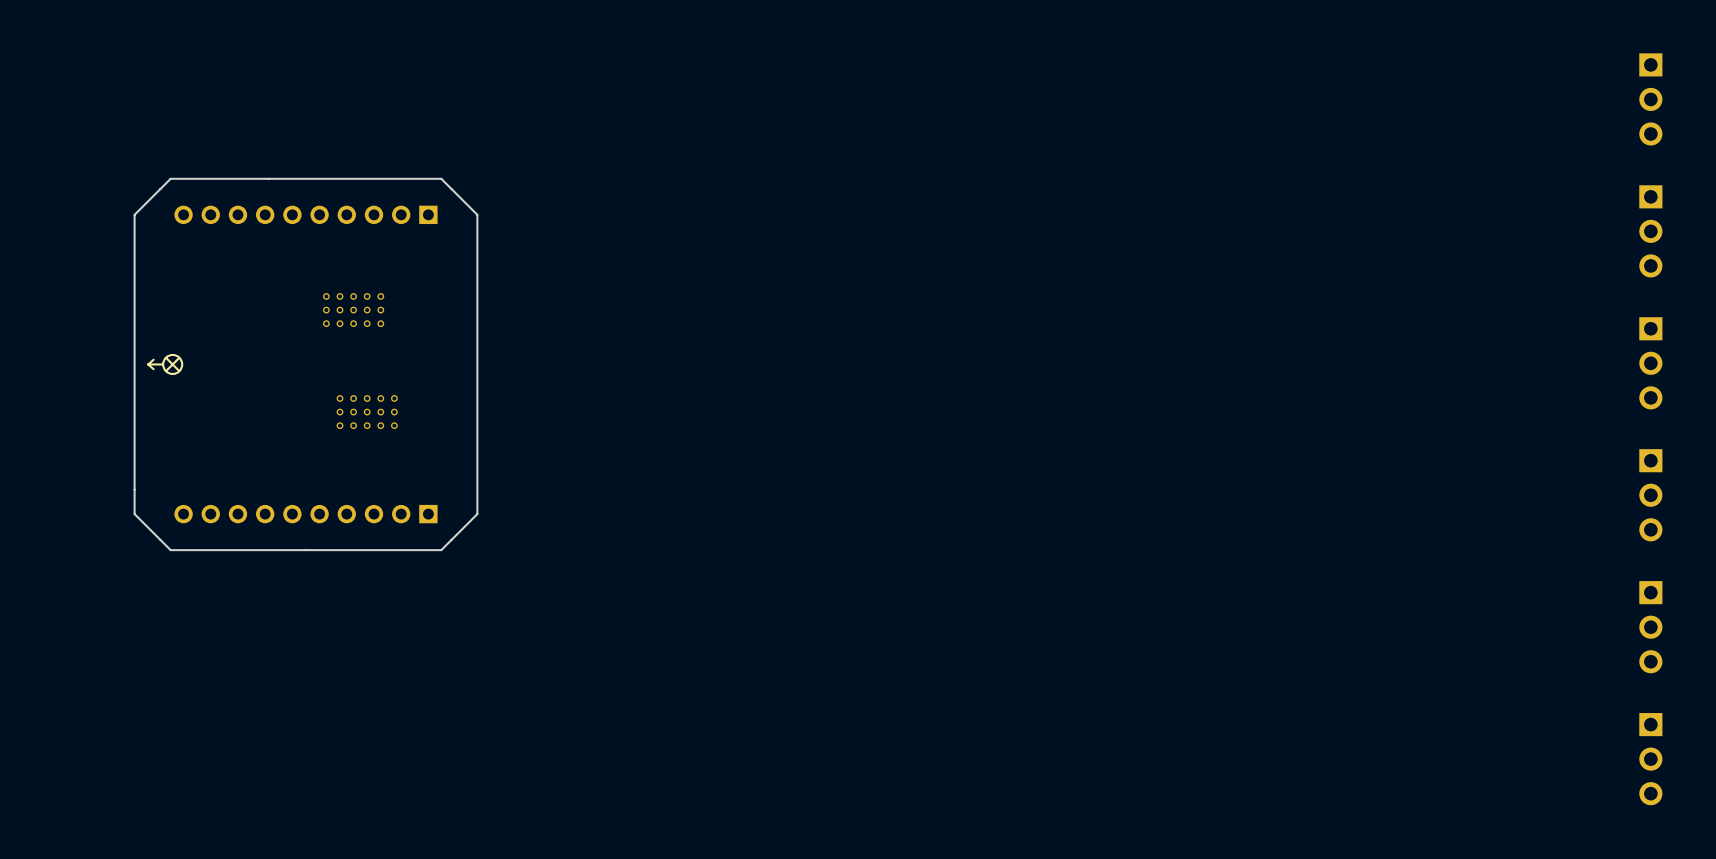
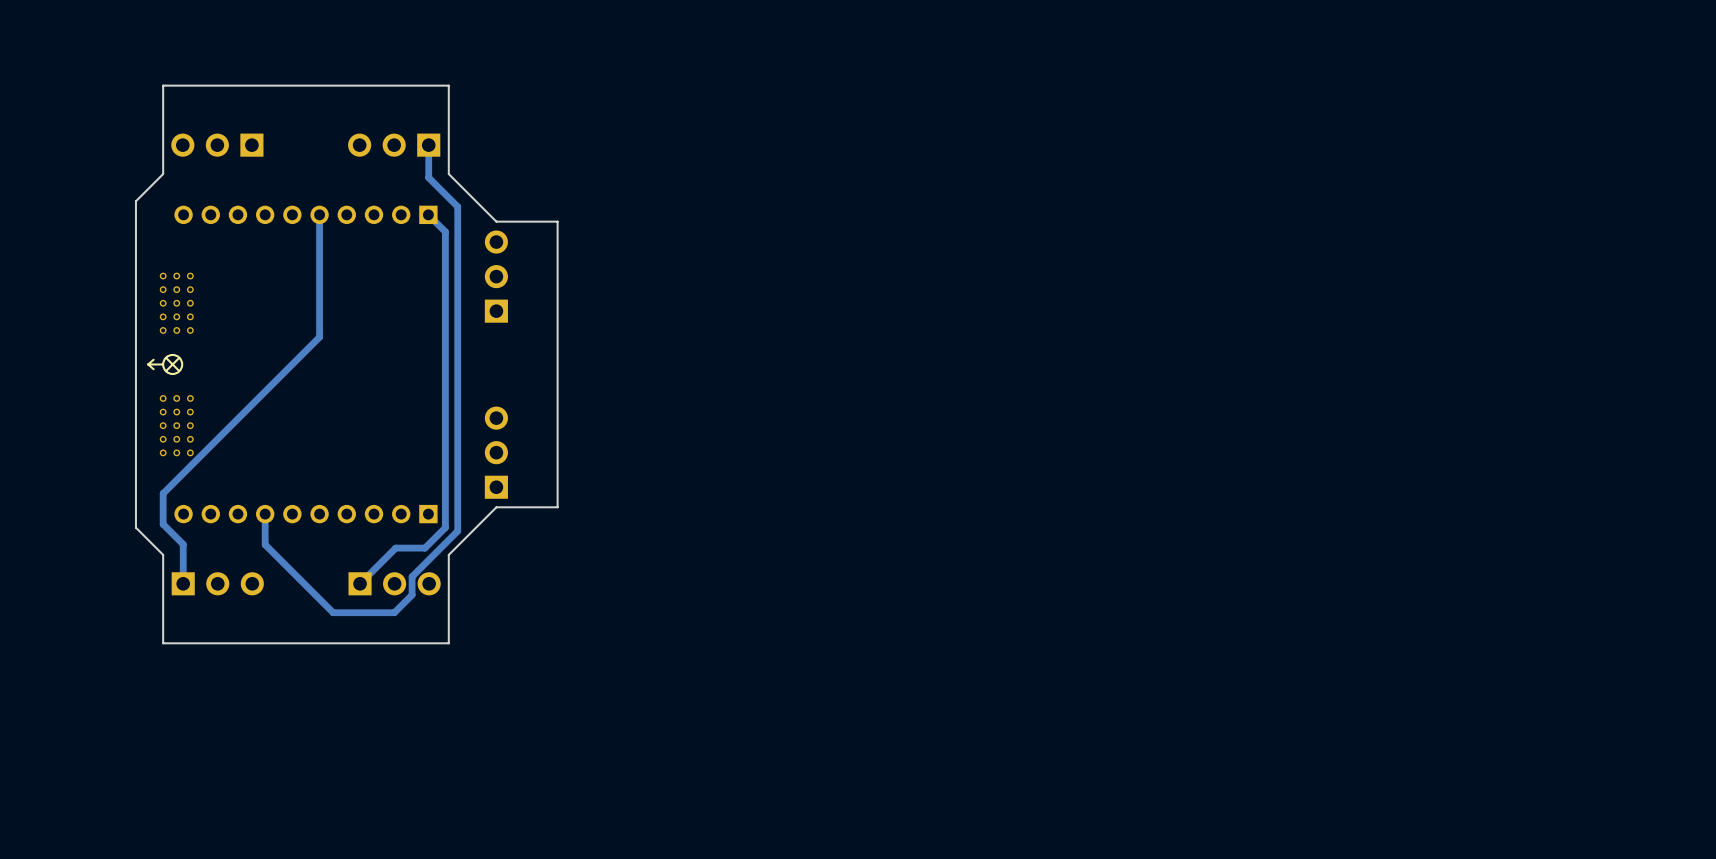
part: (1650, 99) -> none
part: none -> (217, 145)
part: none -> (394, 145)
track: none -> (428, 145) (428, 177) (457, 206) (457, 531) (412, 576) (412, 595) (394, 612) (333, 612) (265, 544) (265, 514)
board edge: (441, 178) (170, 178) (134, 214) (134, 514) (170, 550) (441, 550) (477, 514) (477, 214) (441, 178) -> (448, 85) (448, 174) (496, 221) (557, 221) (557, 507) (496, 507) (448, 554) (448, 643) (163, 643) (163, 554) (135, 527) (135, 201) (163, 174) (163, 85) (448, 85)
track: none -> (319, 214) (319, 337) (163, 493) (163, 524) (183, 544) (183, 583)
track: none -> (428, 214) (445, 231) (445, 527) (425, 548) (395, 548) (360, 583)
part: (1650, 231) -> none
part: none -> (496, 276)
part: none -> (176, 303)
part: (353, 310) -> none
part: (1650, 363) -> none
part: (367, 412) -> none
part: none -> (176, 425)
part: none -> (496, 452)
part: (1650, 495) -> none
part: none -> (217, 583)
part: none -> (394, 583)
part: (1650, 627) -> none
part: (1650, 759) -> none

